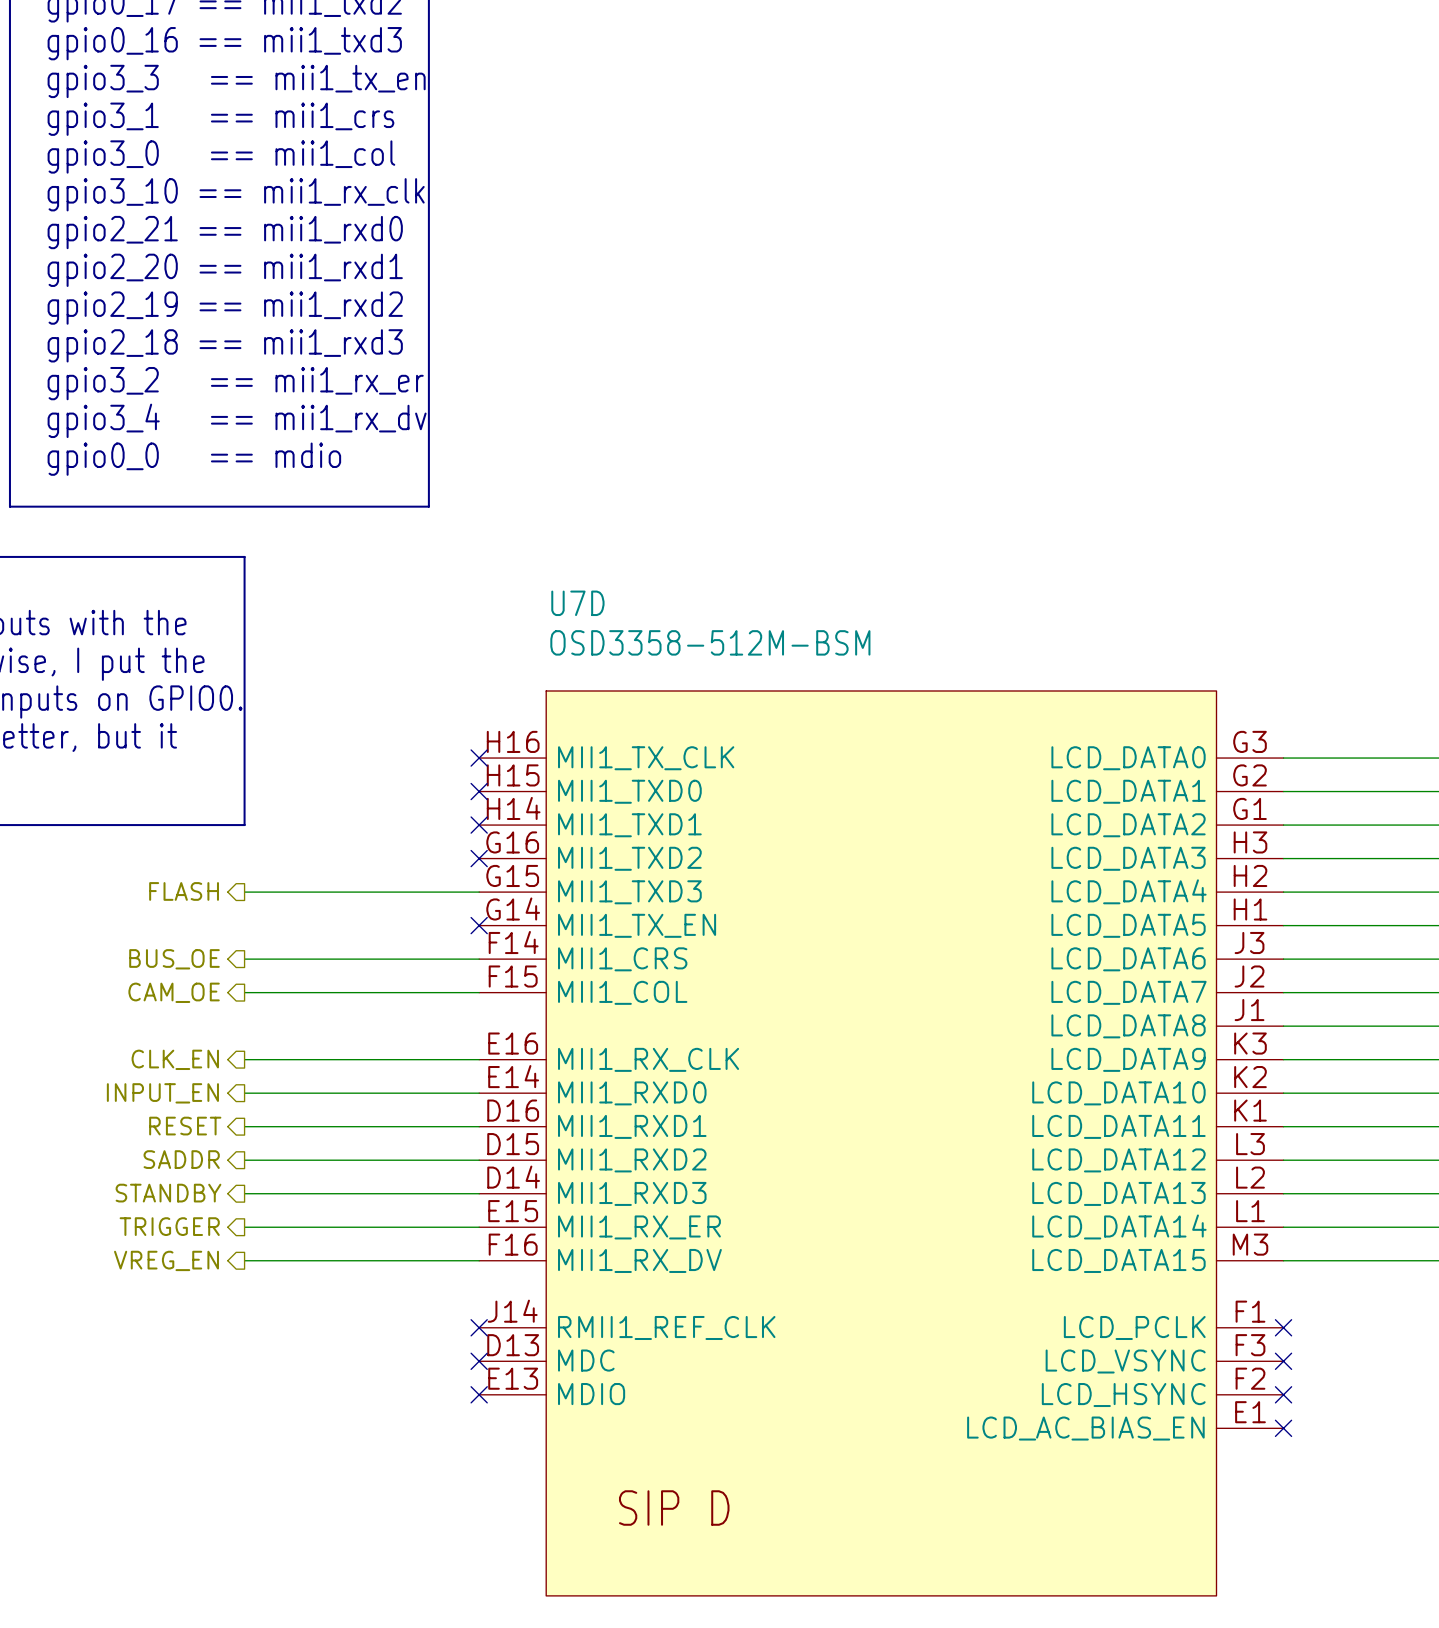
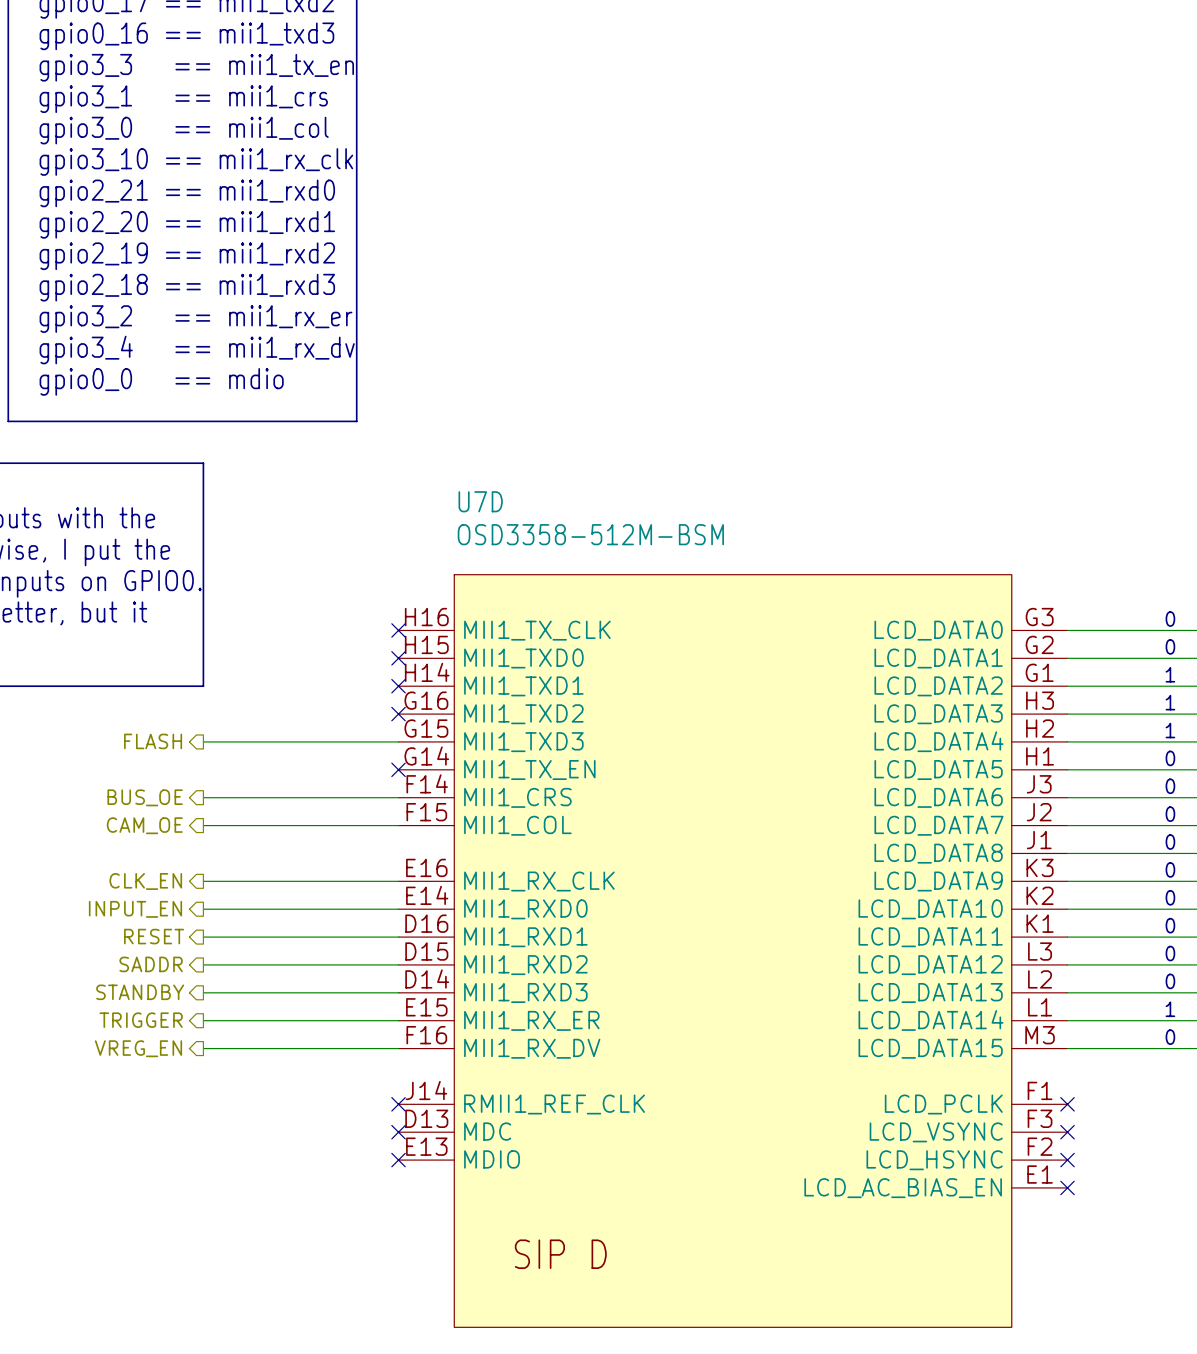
text: none -> 0 (1170, 619)
text: none -> 0 (1170, 646)
text: none -> 1 (1170, 674)
text: none -> 1 (1170, 702)
text: none -> 1 (1170, 730)
text: none -> 0 (1170, 758)
text: none -> 0 (1170, 786)
text: none -> 0 (1170, 814)
text: none -> 0 (1170, 842)
text: none -> 0 (1170, 869)
text: none -> 0 (1170, 897)
text: none -> 0 (1170, 925)
text: none -> 0 (1170, 953)
text: none -> 0 (1170, 981)
text: none -> 1 (1170, 1009)
text: none -> 0 (1170, 1037)

